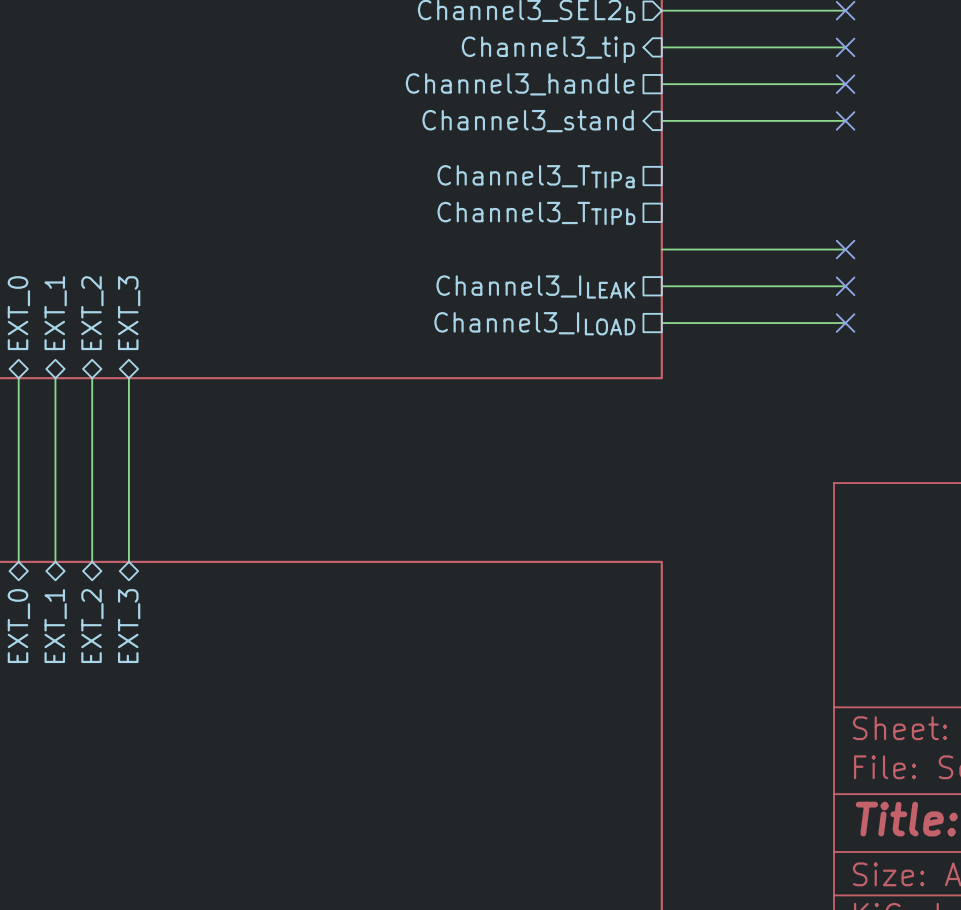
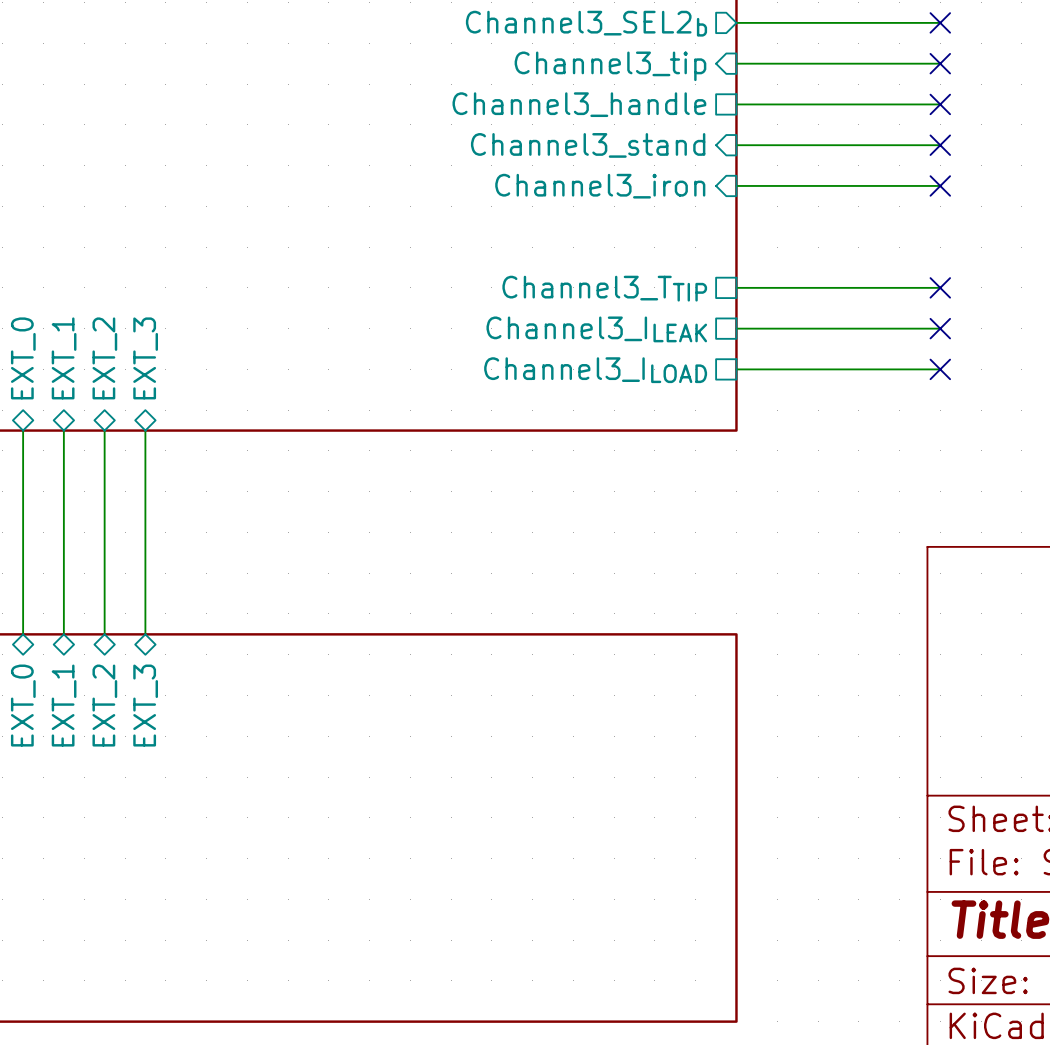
sheet pin: none -> Channel3_iron (600, 186)
wire: none -> (736, 185) (940, 185)
no-connect mark: none -> (940, 185)
sheet pin: Channel3_TTIPa (536, 176) -> none
sheet pin: Channel3_TTIPb (536, 213) -> Channel3_TTIP (604, 288)

